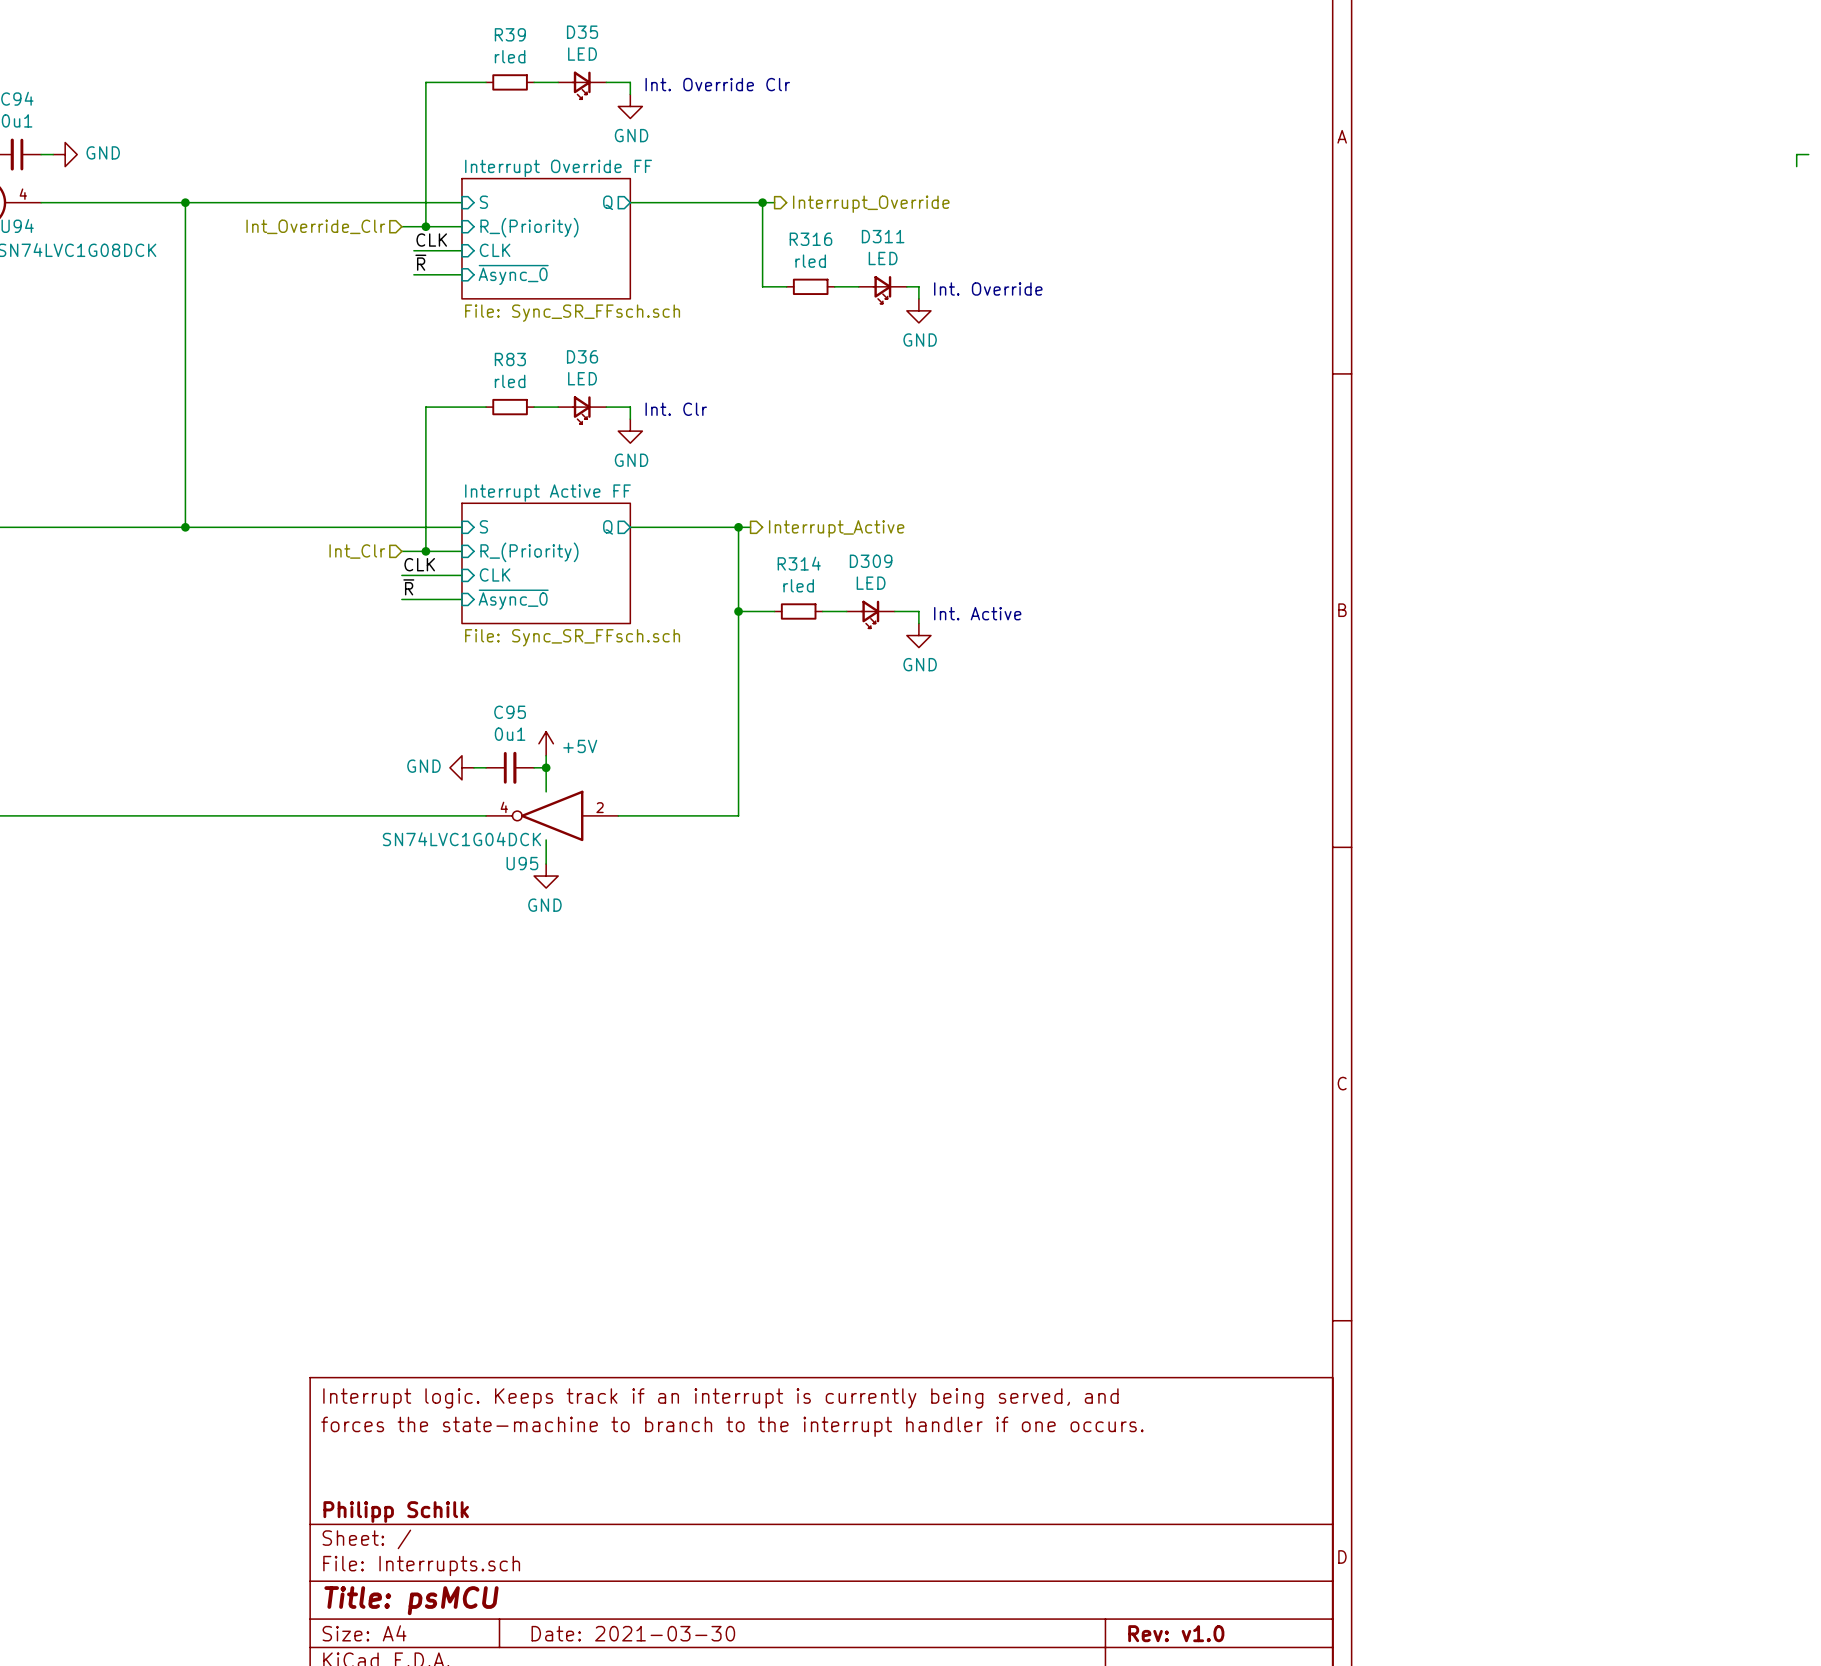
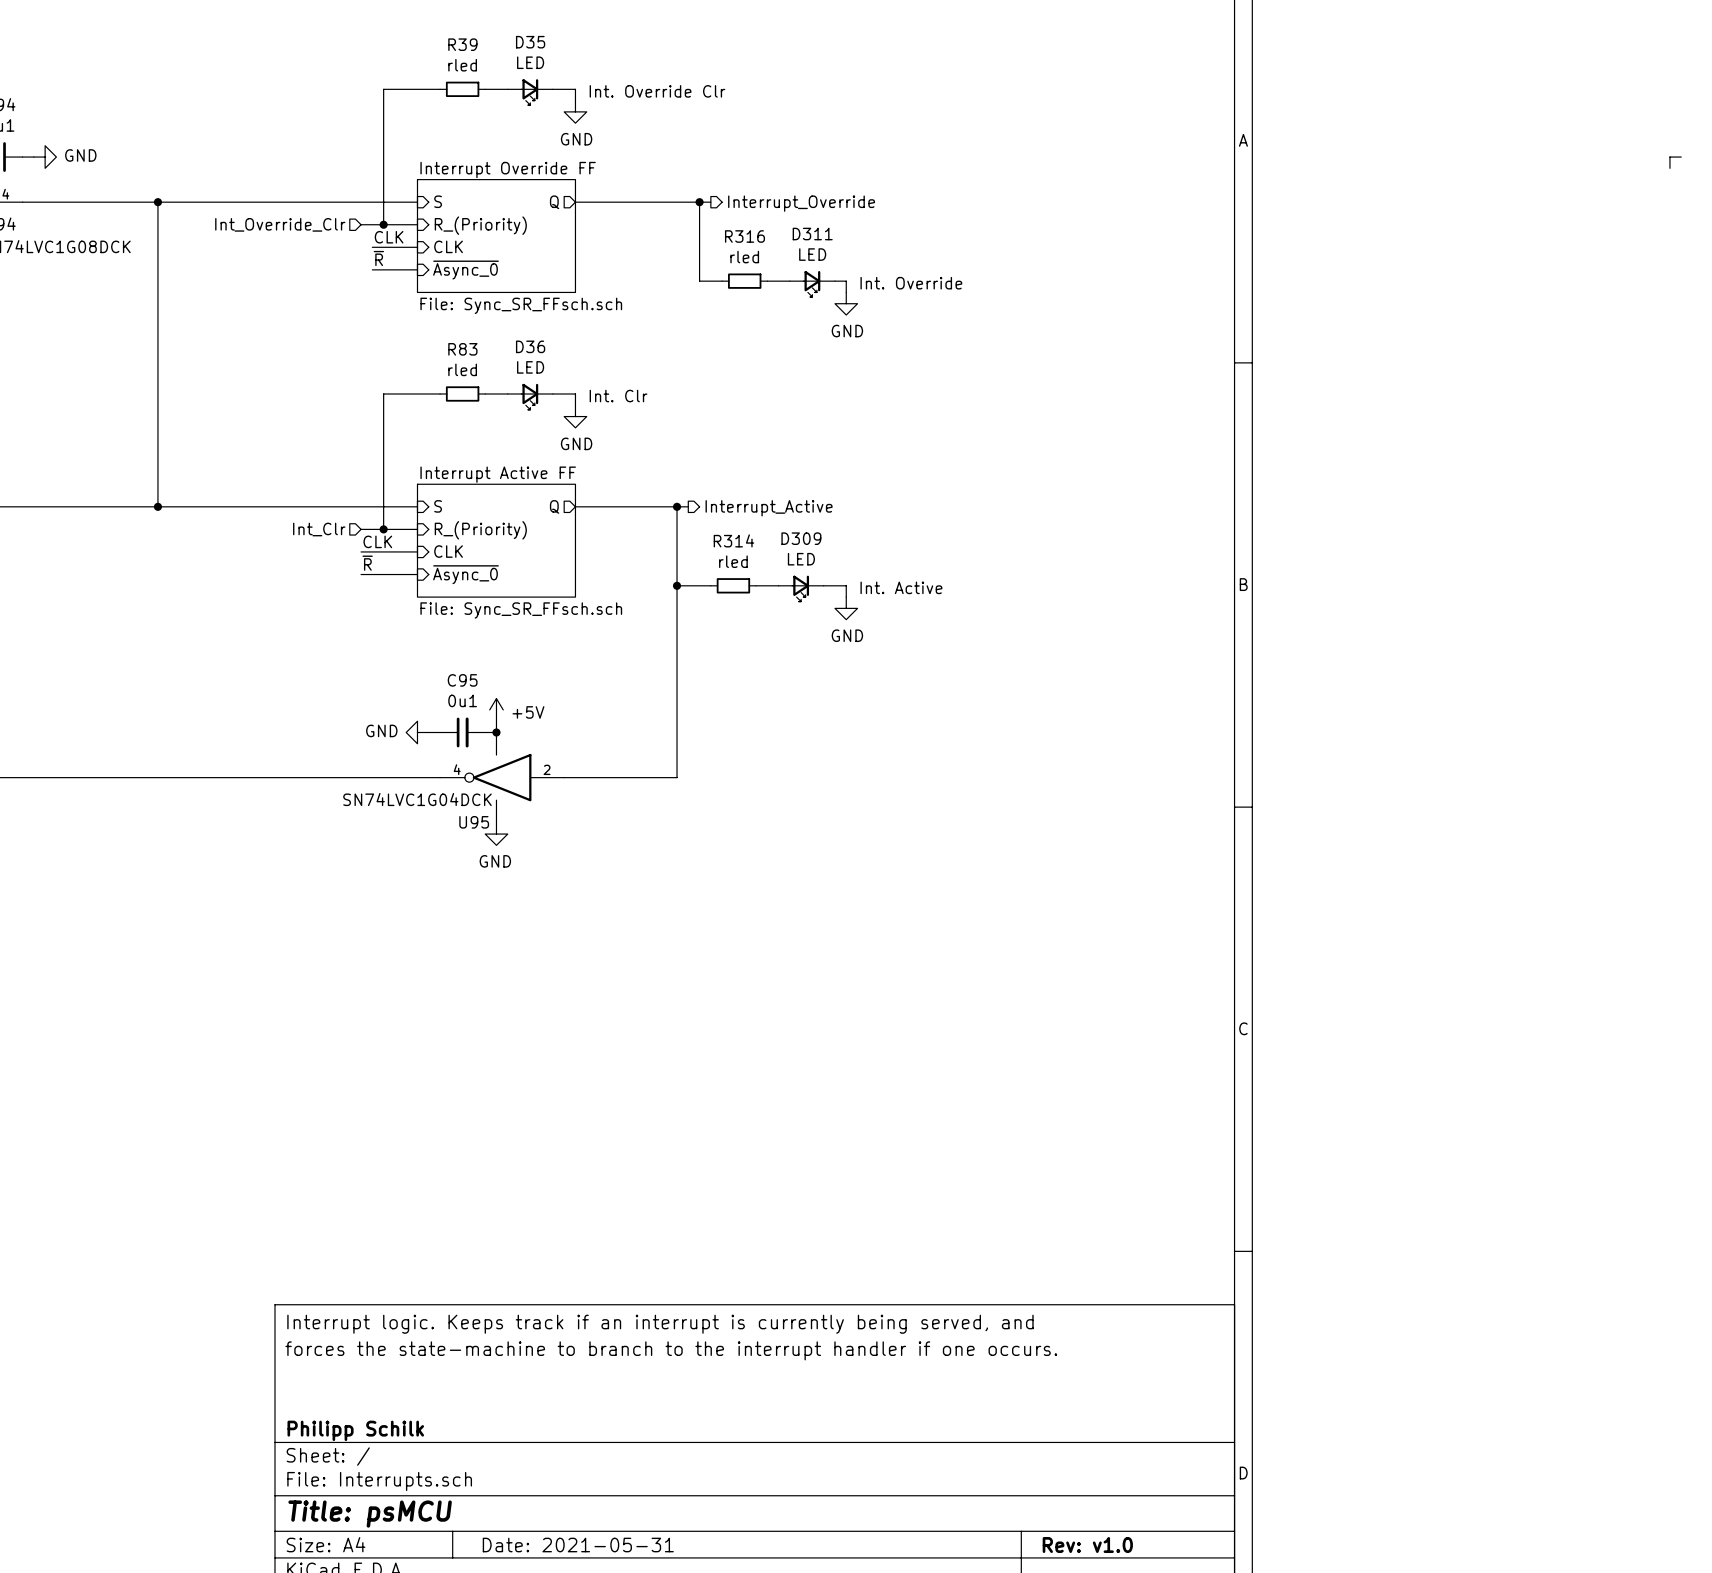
title block: Date: 2021-03-30 (633, 1633) -> Date: 2021-05-31 (578, 1545)

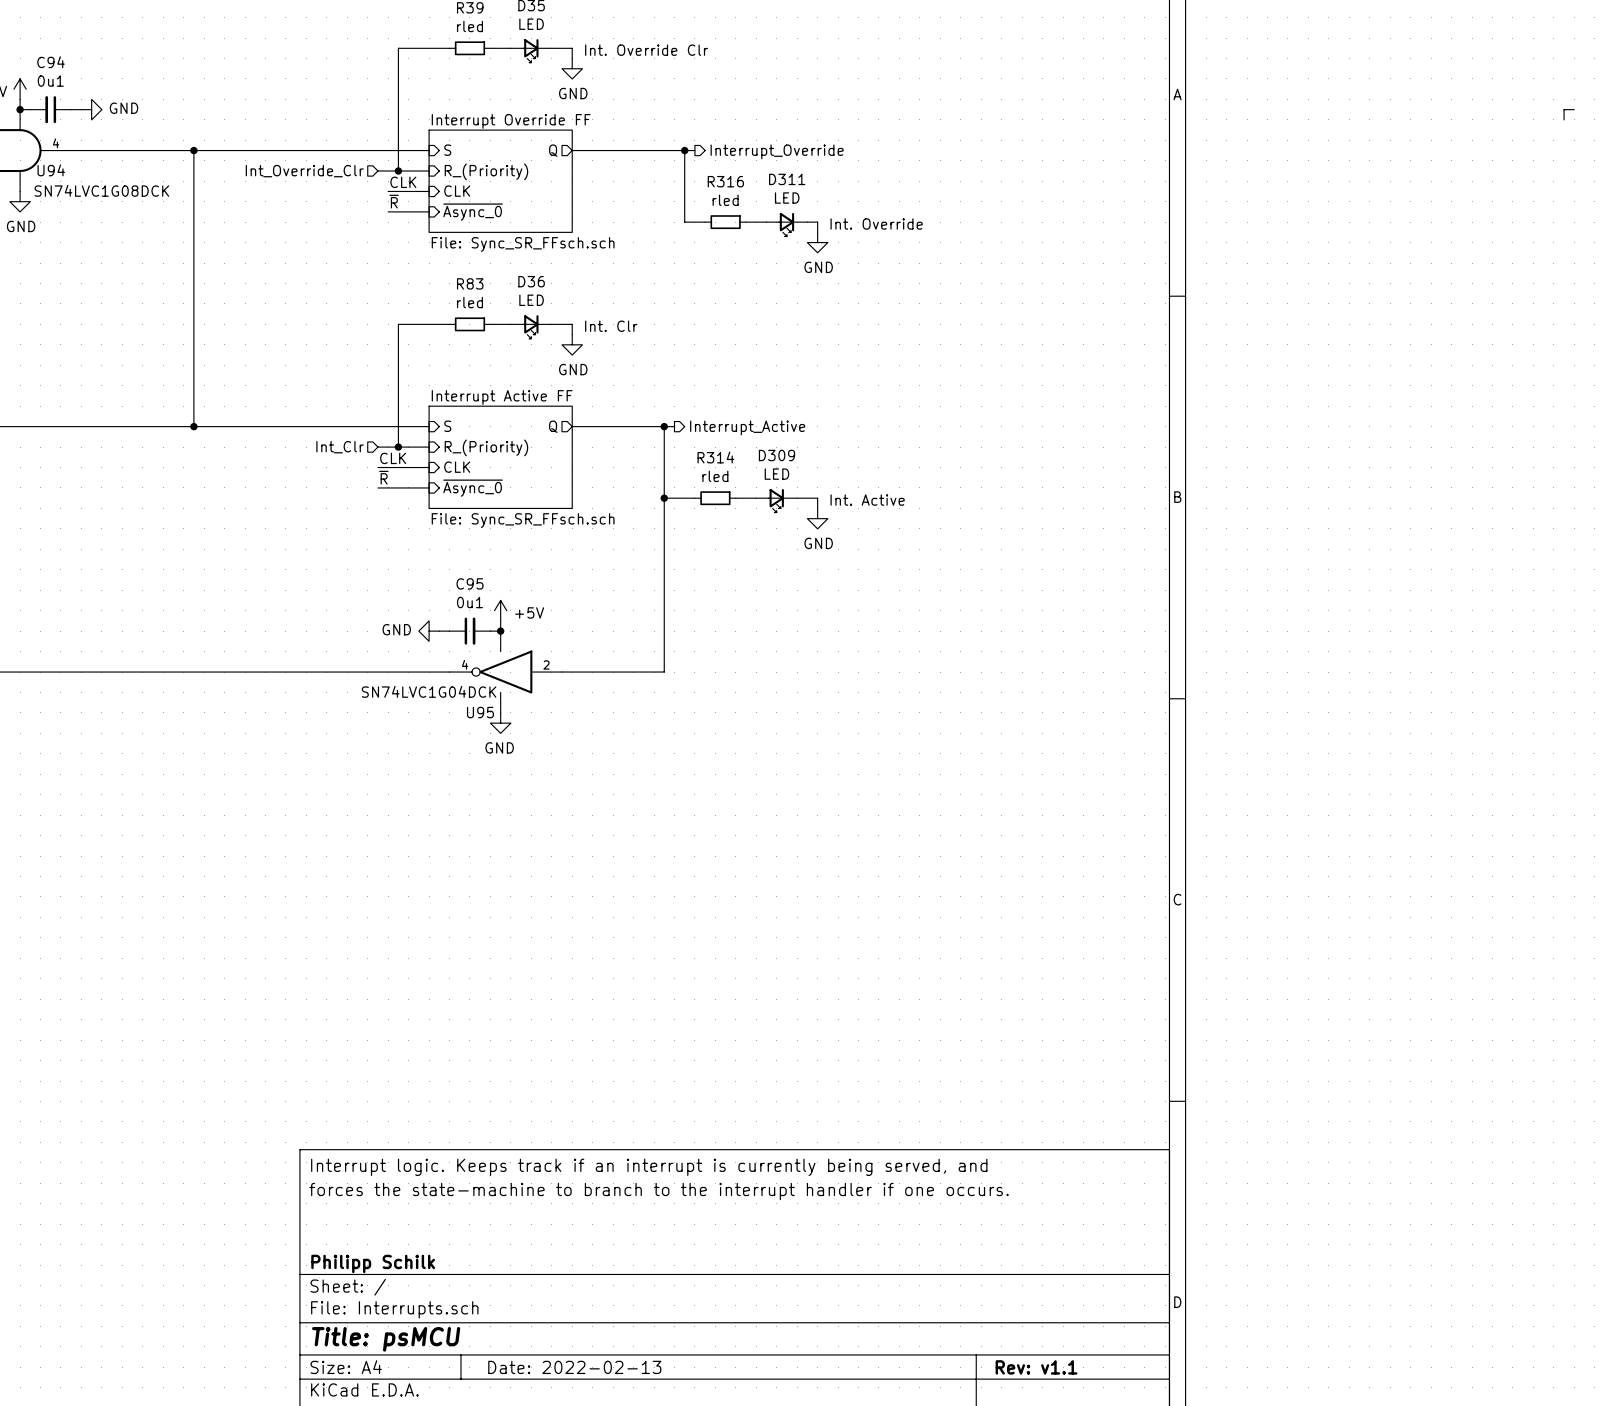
title block: Date: 2021-05-31 (578, 1545) -> Date: 2022-02-13 (574, 1367)
title block: Rev: v1.0 (1087, 1545) -> Rev: v1.1 (1036, 1367)

